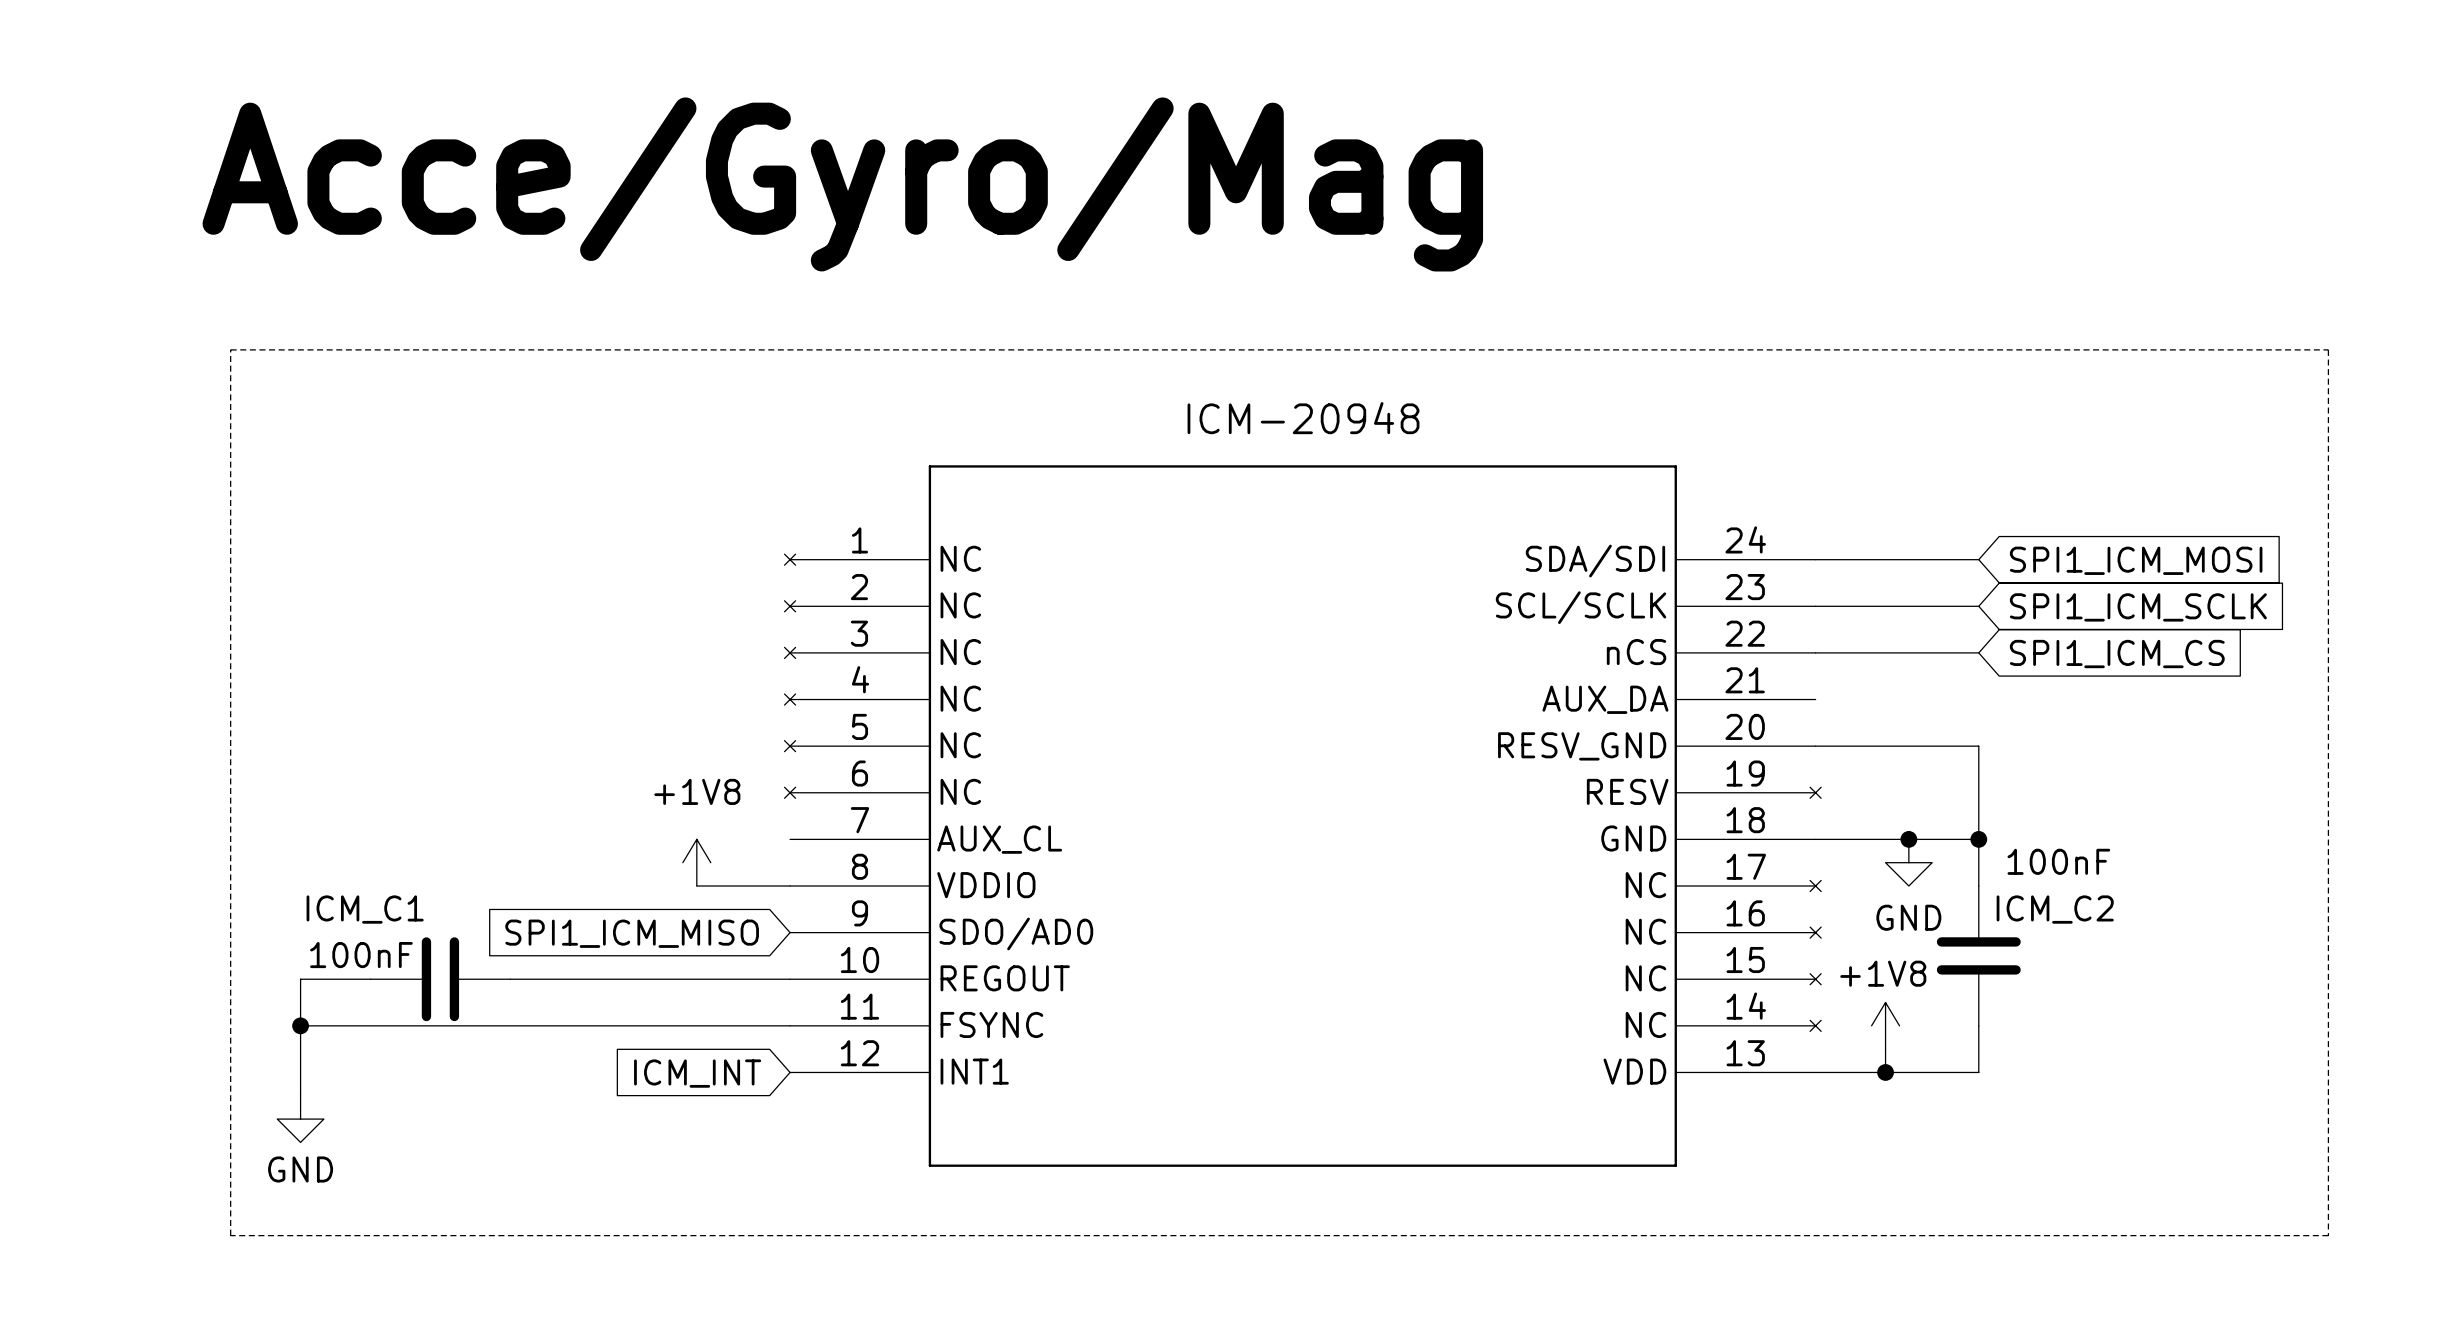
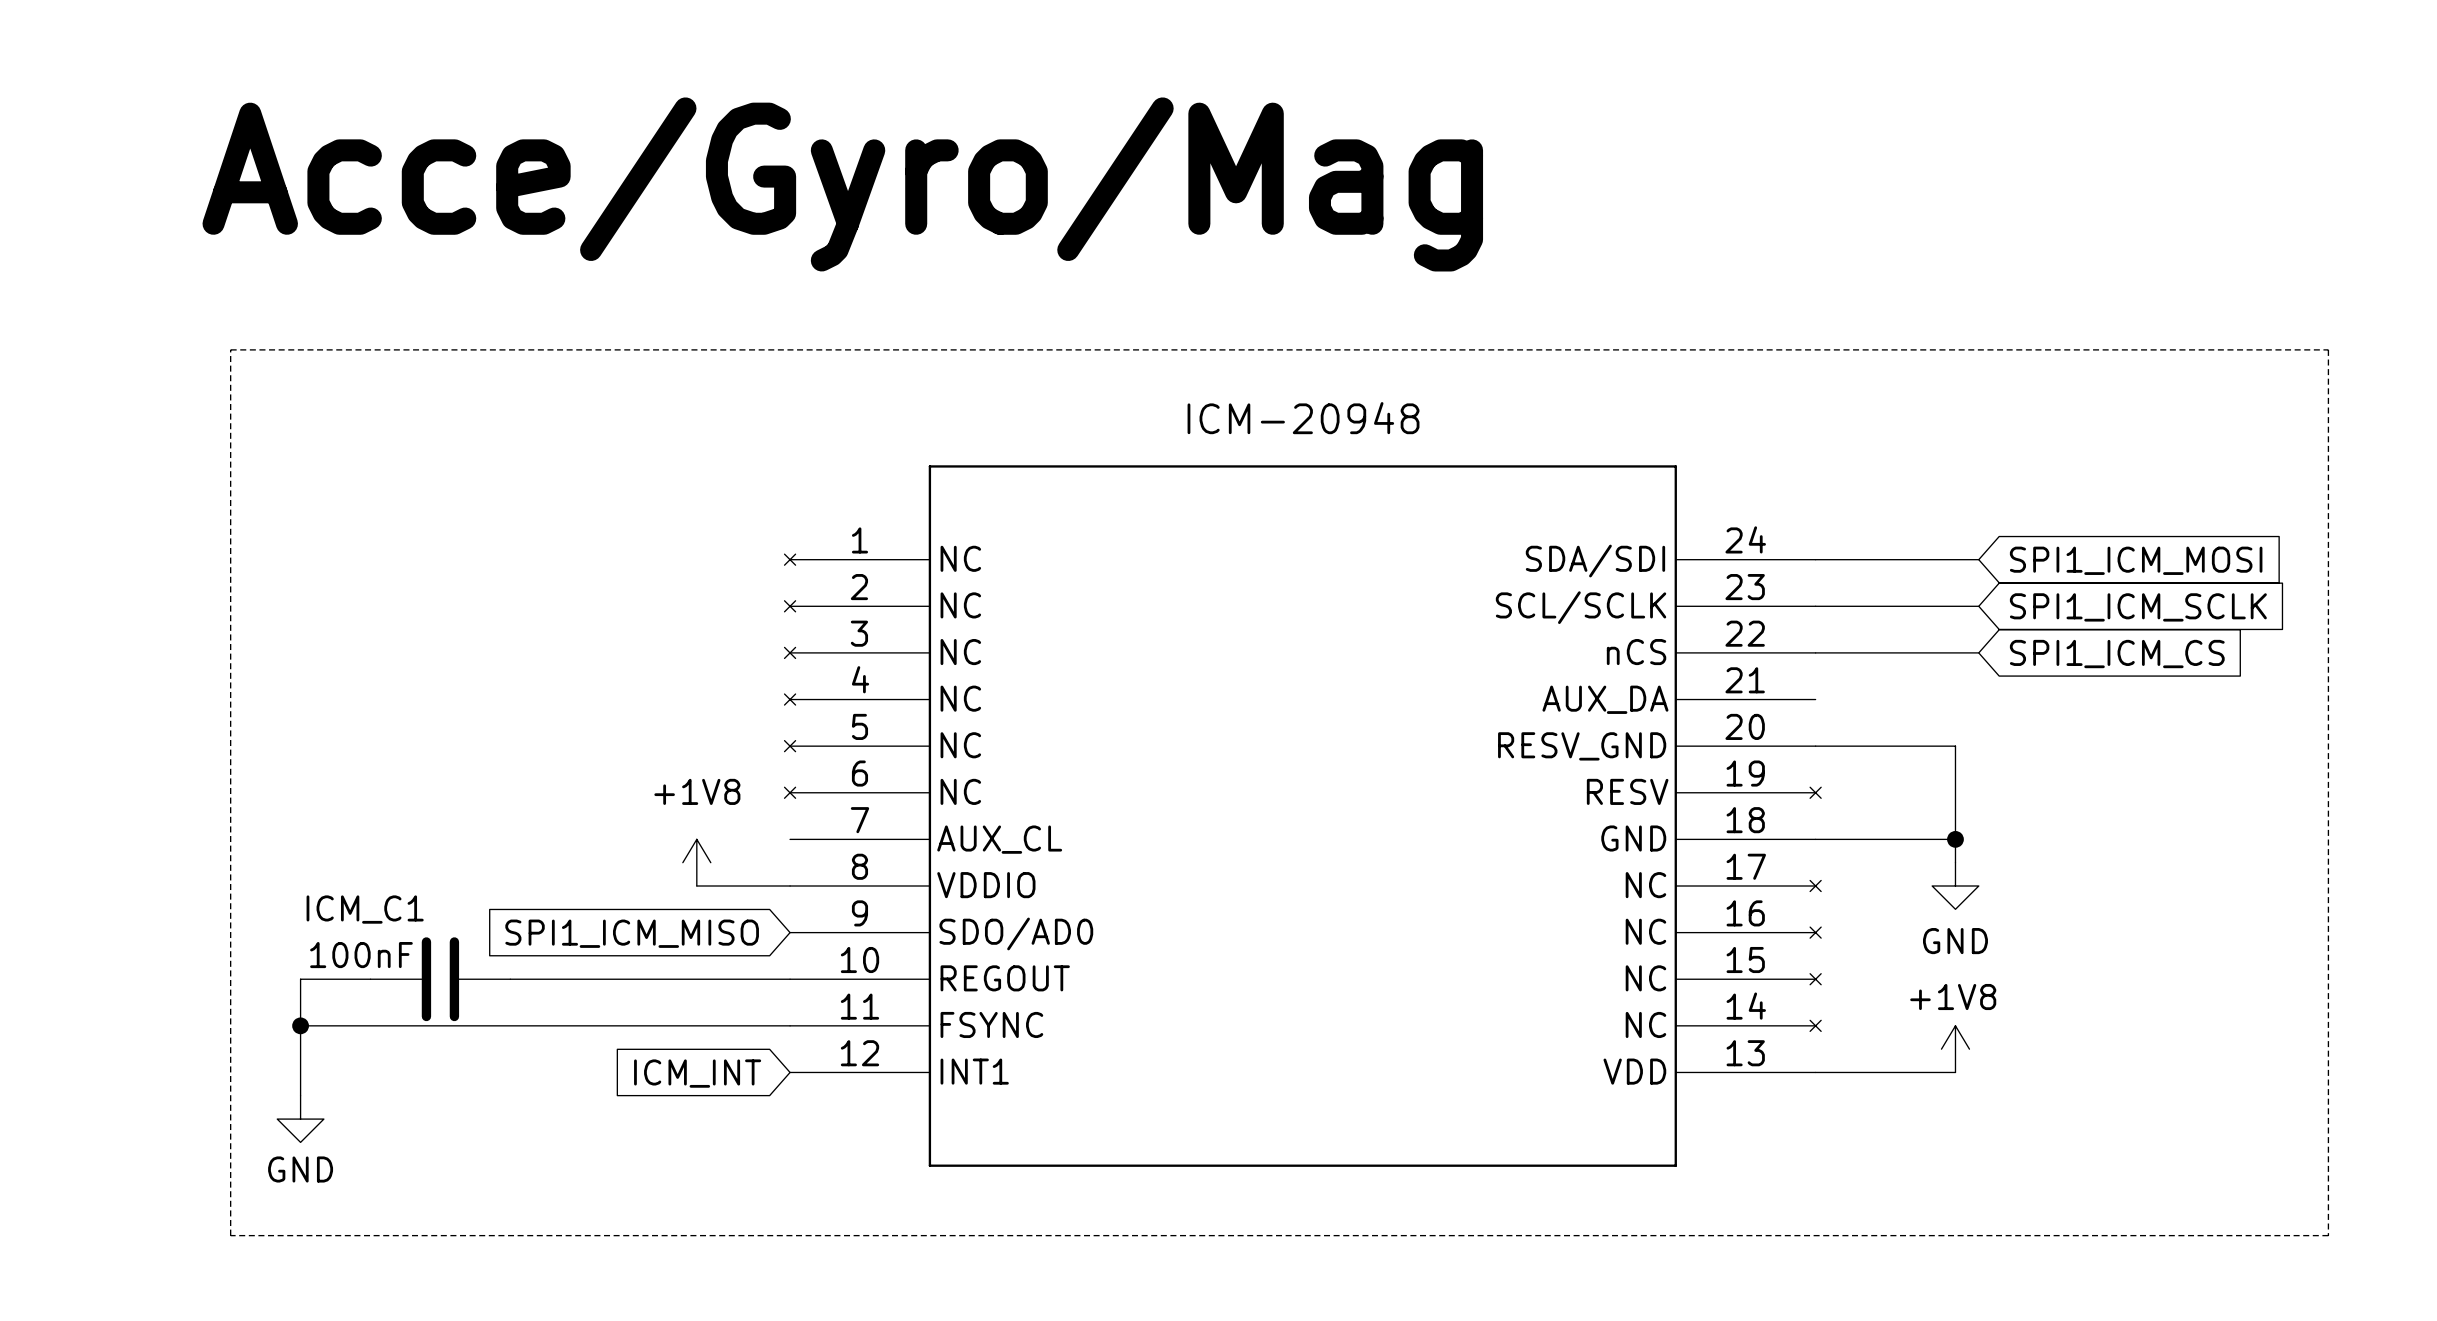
wire: (1955, 746) (1978, 746) (1978, 886) -> (1955, 746) (1955, 862)
junction: (1908, 839) -> none
wire: (1955, 839) (1978, 839) -> none
junction: none -> (1955, 839)
junction: (1978, 839) -> none
power symbol position: GND (1908, 862) -> GND (1955, 886)
ICM_C2: 100nF (1978, 955) -> none
power symbol position: +1V8 (1885, 1025) -> +1V8 (1955, 1049)
wire: (1978, 1025) (1978, 1072) (1955, 1072) -> none
wire: (1885, 1049) (1885, 1072) -> none
junction: (1885, 1072) -> none

